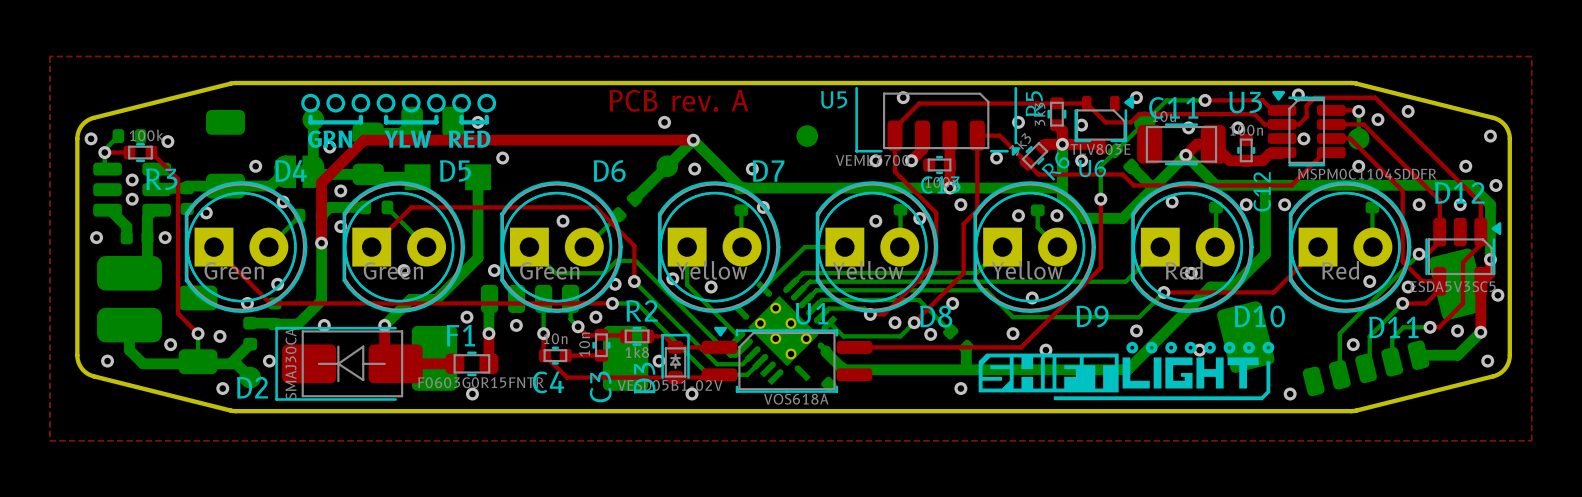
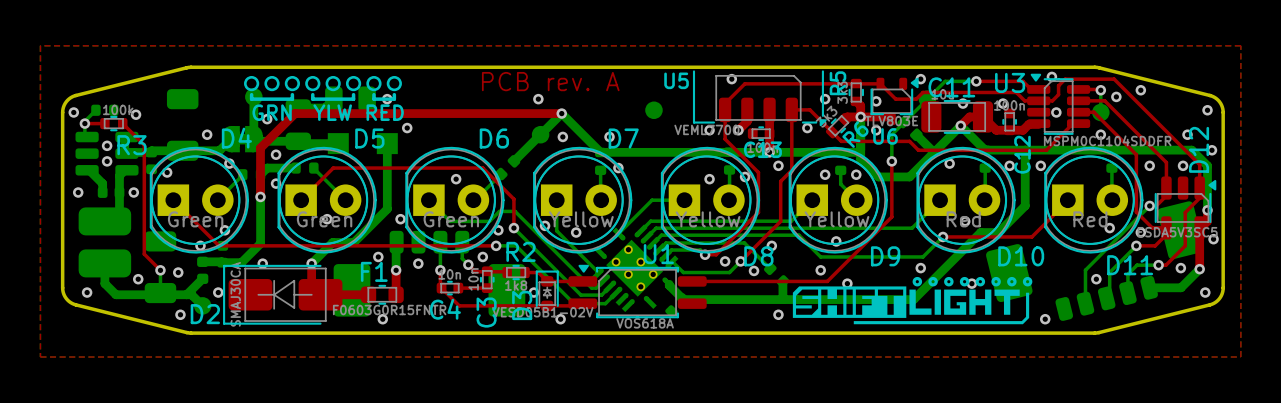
D12 name rotation: 0° (1459, 192) -> 90° counterclockwise (1199, 149)

